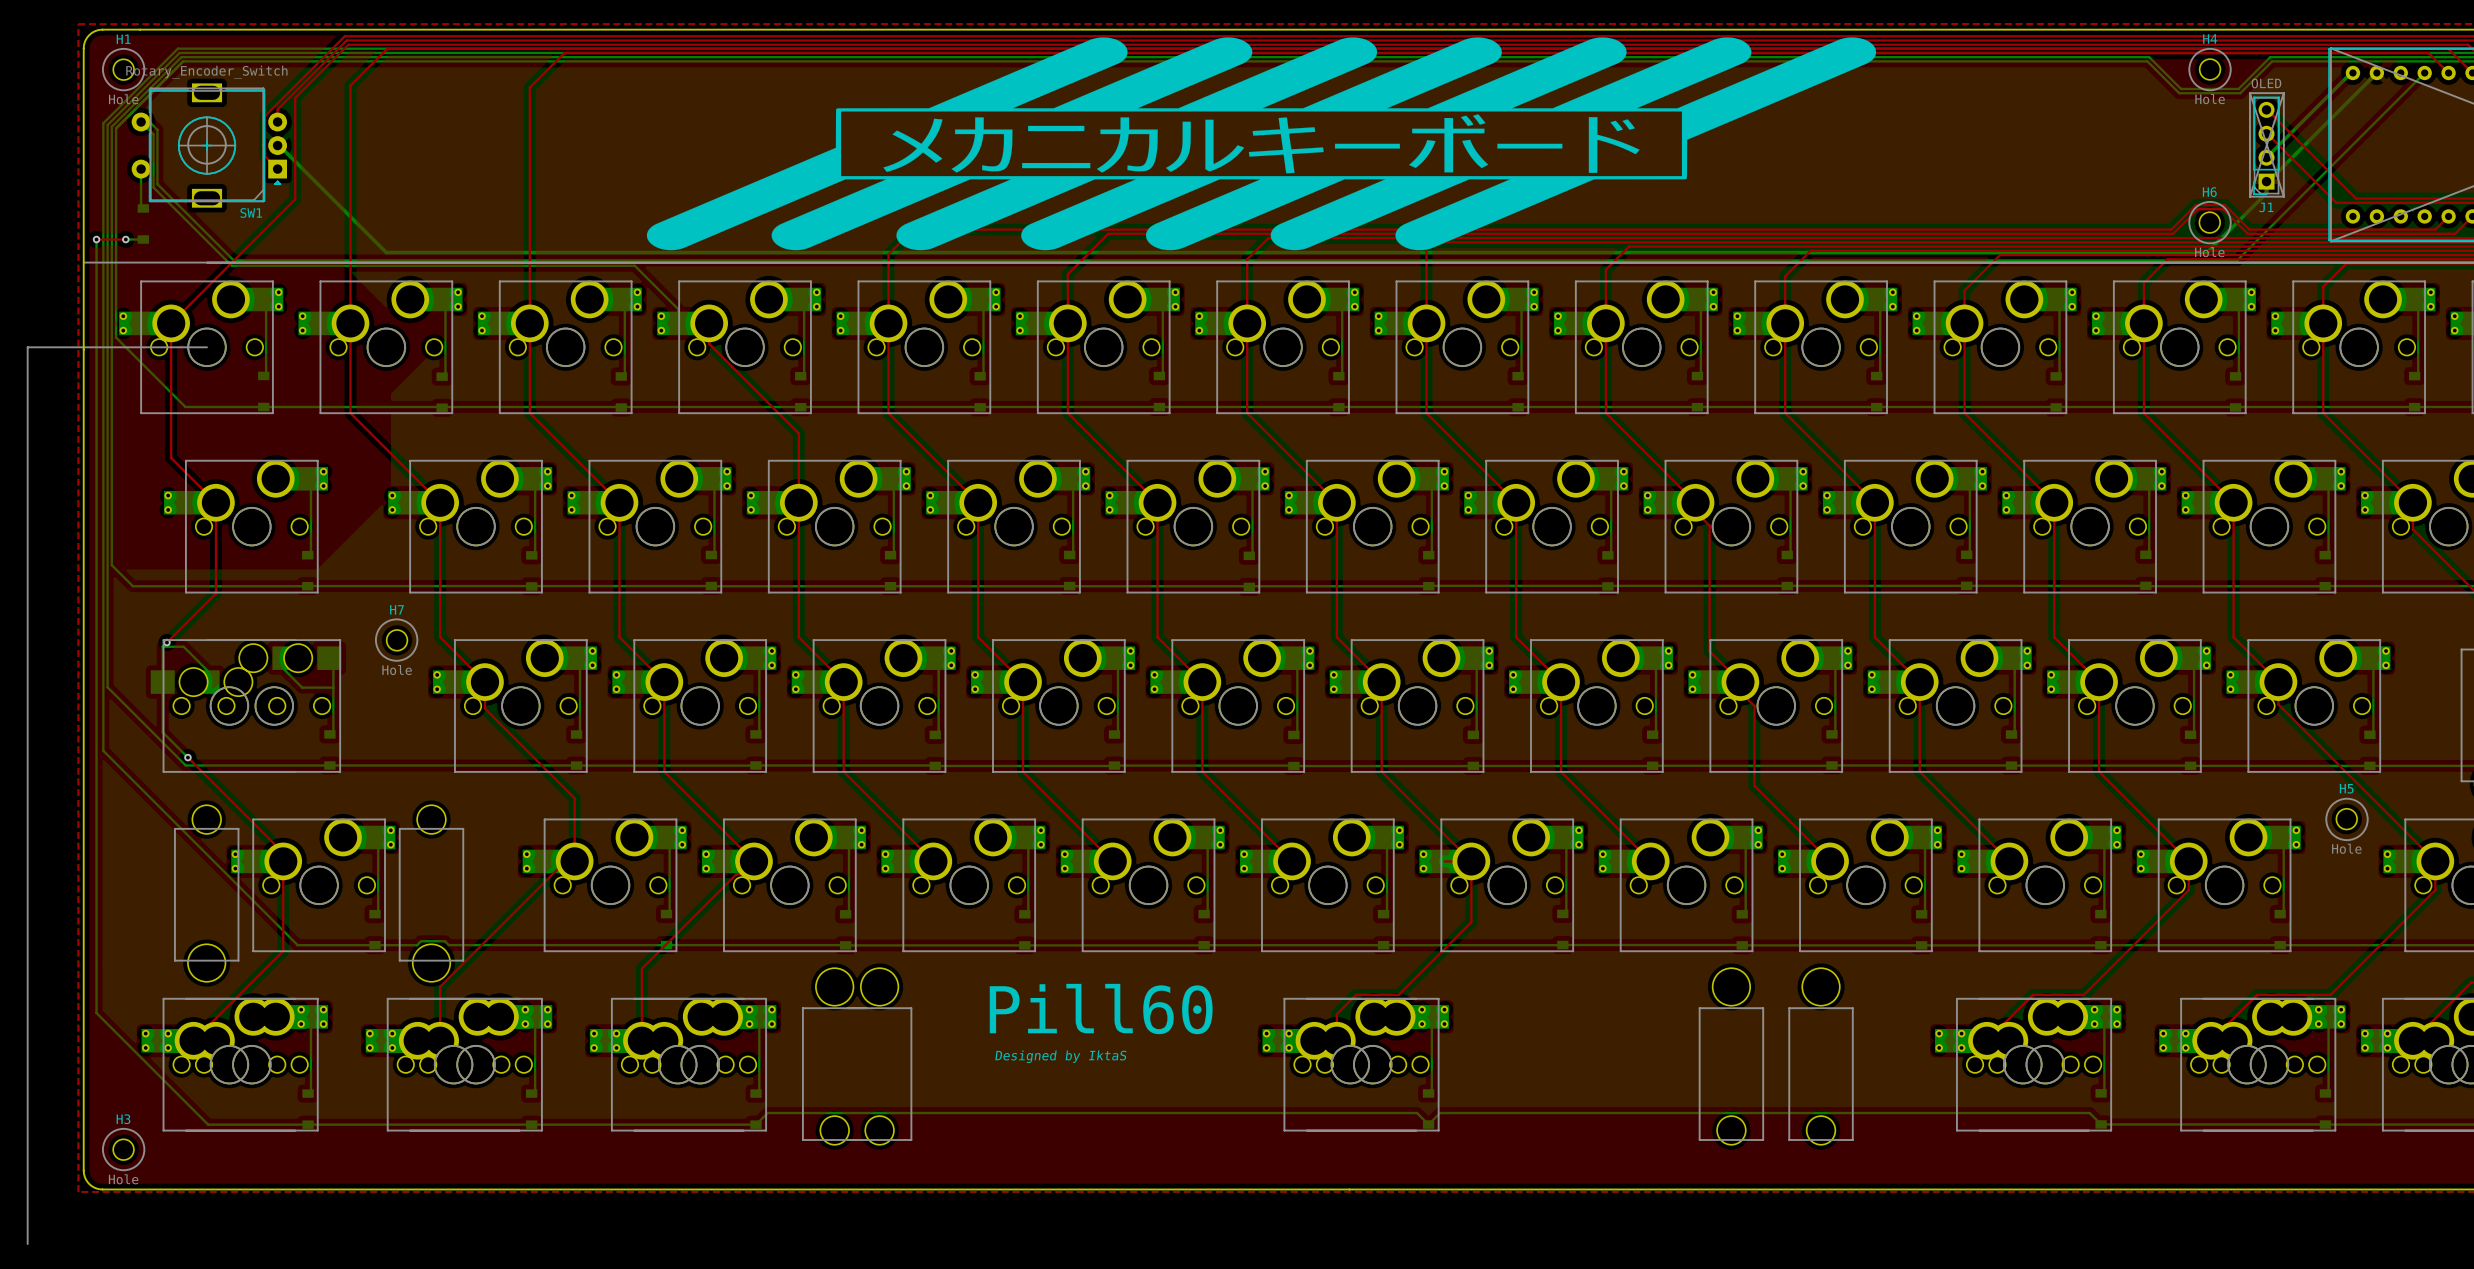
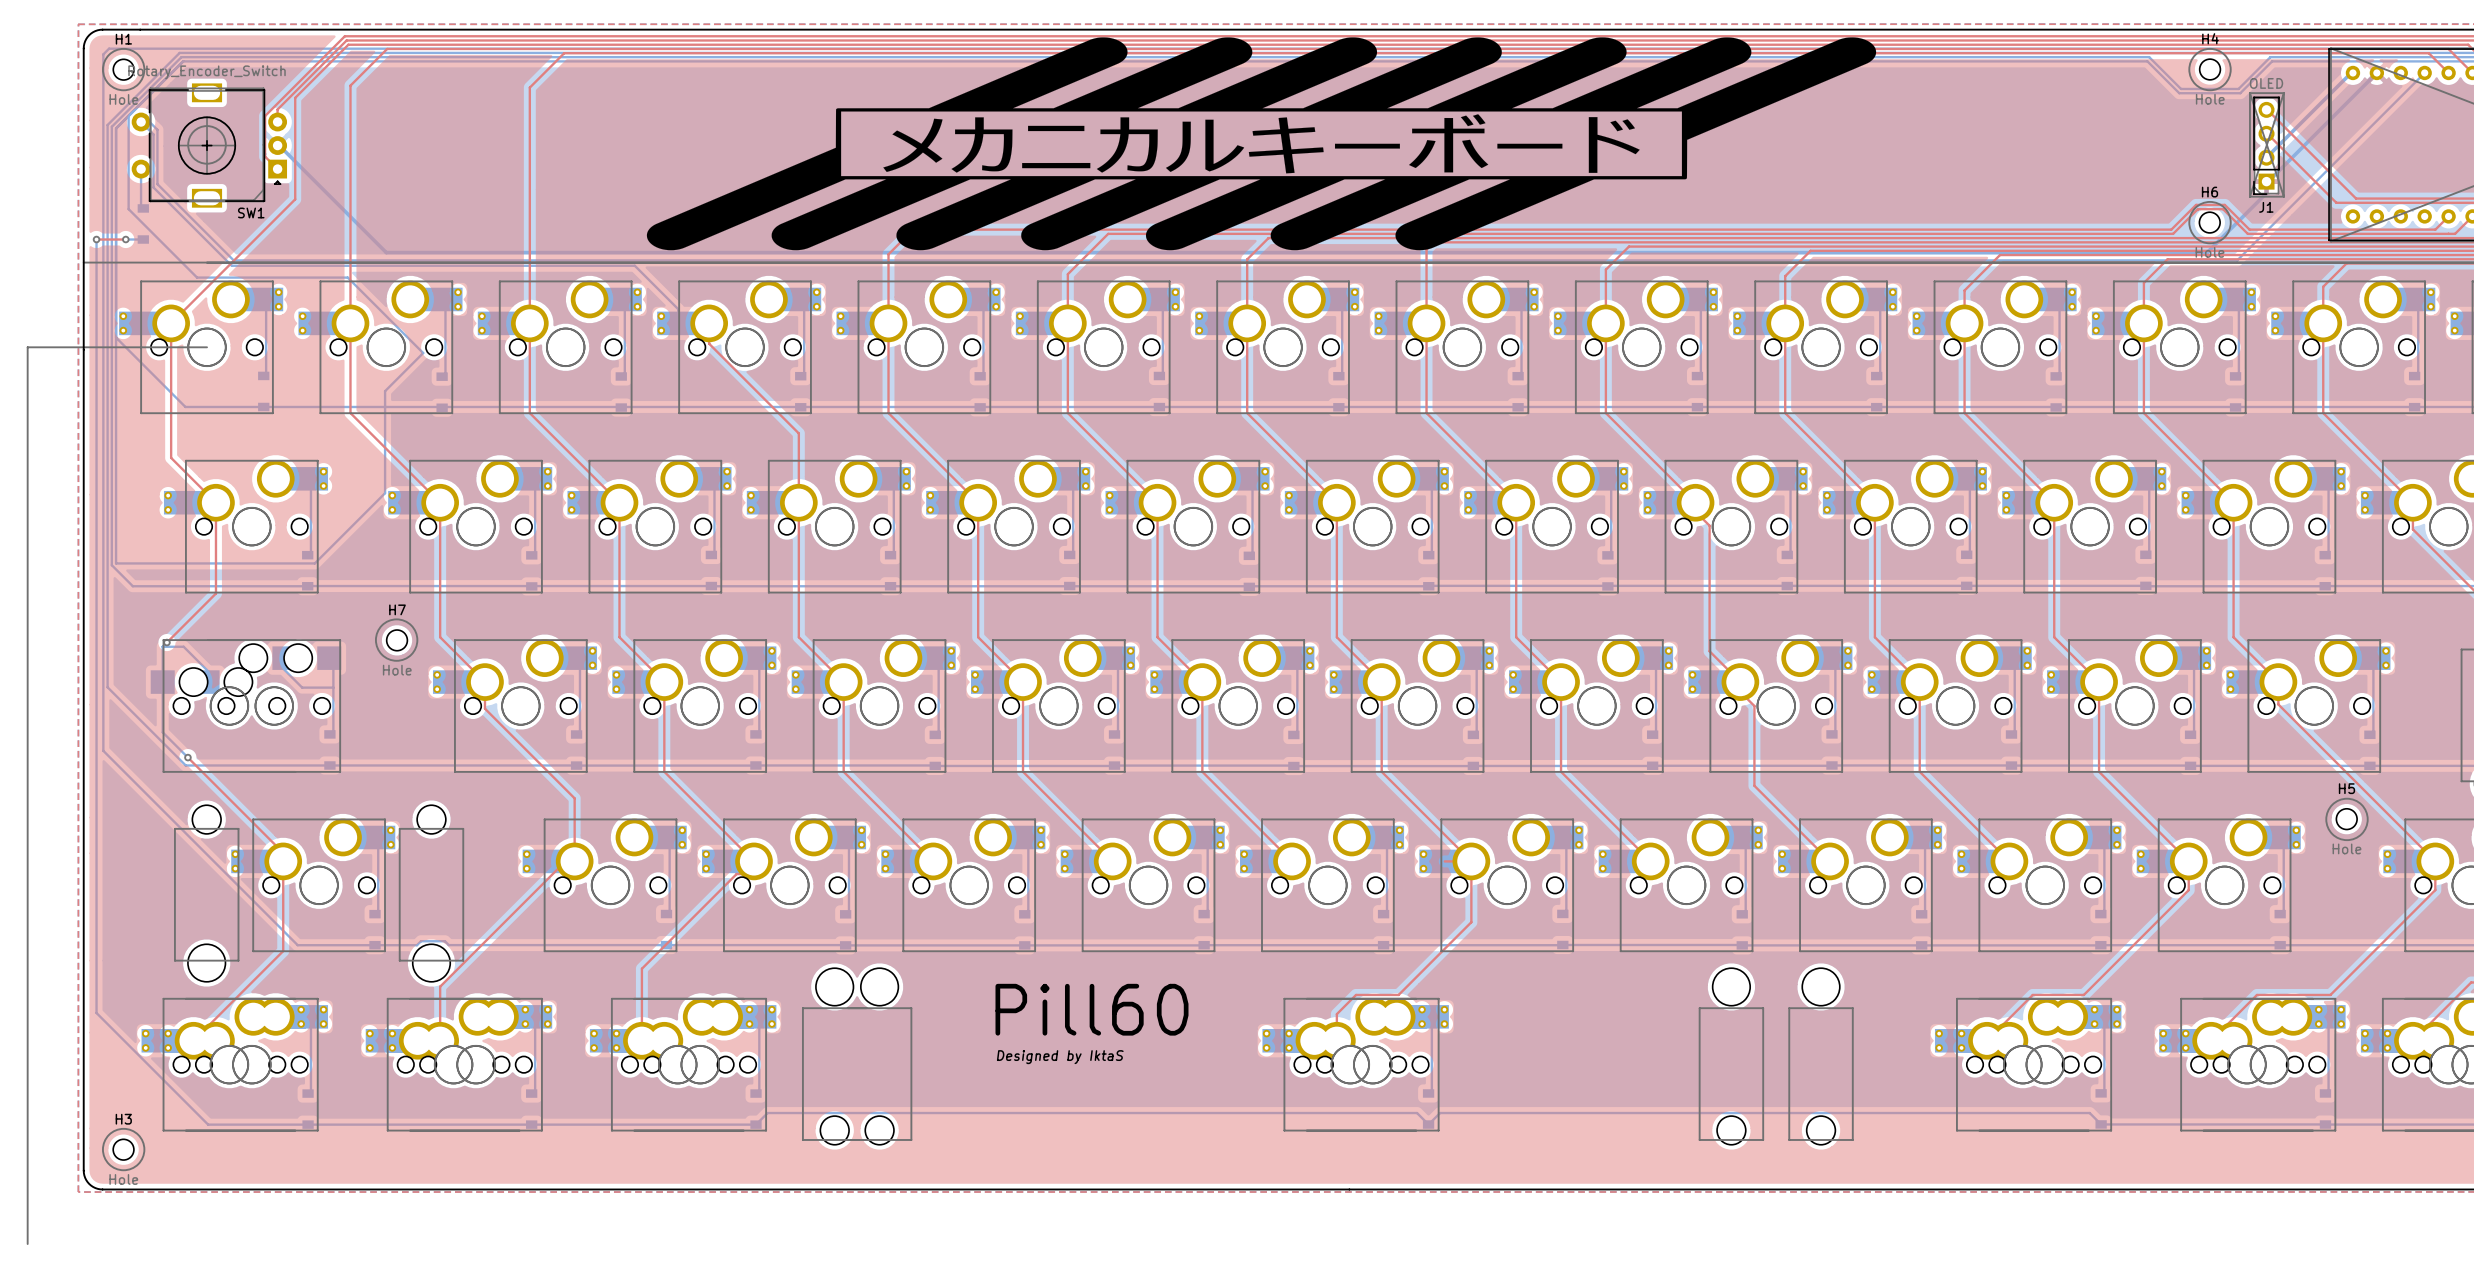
bottom track: (177, 48) (103, 123) -> (177, 48) (109, 48) (103, 54) (103, 123)
bottom track: none -> (128, 116) (128, 209) (197, 277) (347, 277) (423, 353) (385, 391) (385, 493) (314, 563) (116, 563) (116, 128)

